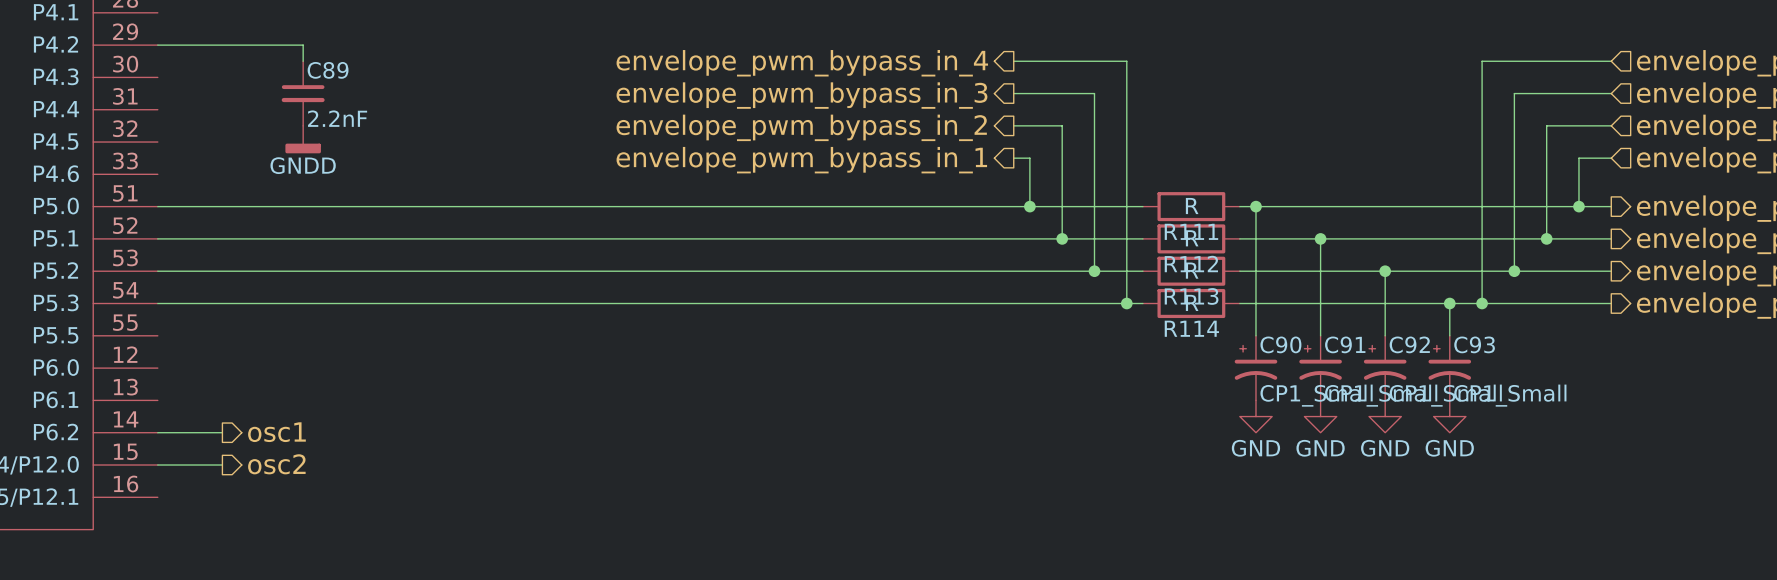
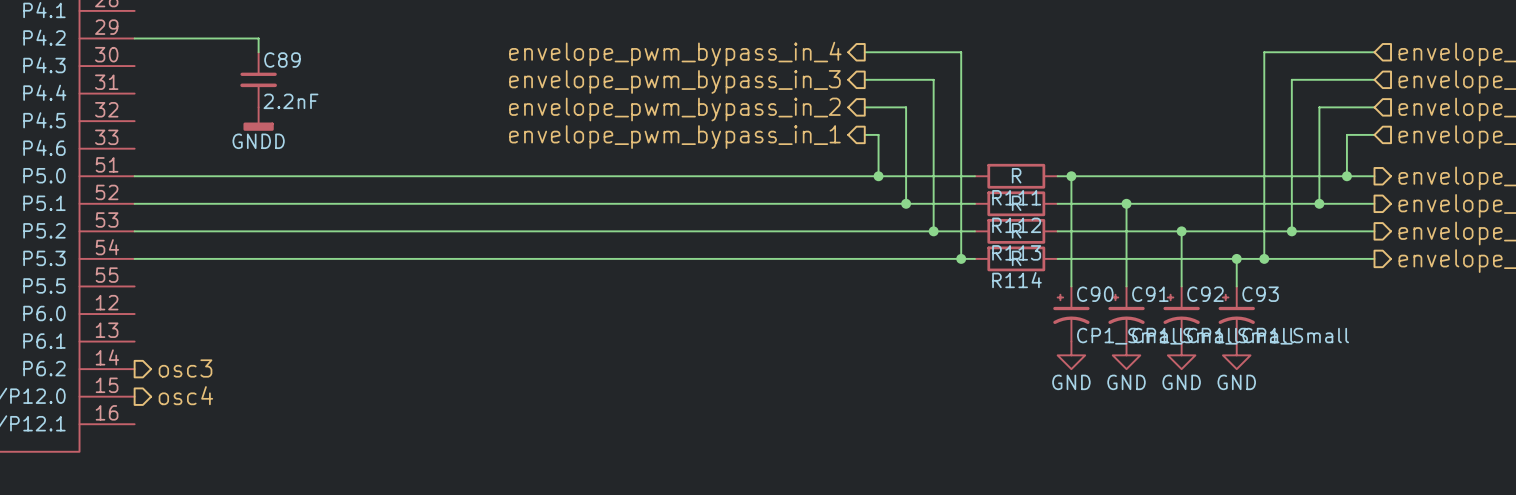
wire: (157, 432) (222, 432) -> none
hierarchical label: none -> osc3 (185, 368)
hierarchical label: osc1 (276, 432) -> none
hierarchical label: none -> osc4 (185, 395)
hierarchical label: osc2 (276, 464) -> none
wire: (157, 465) (222, 465) -> none

